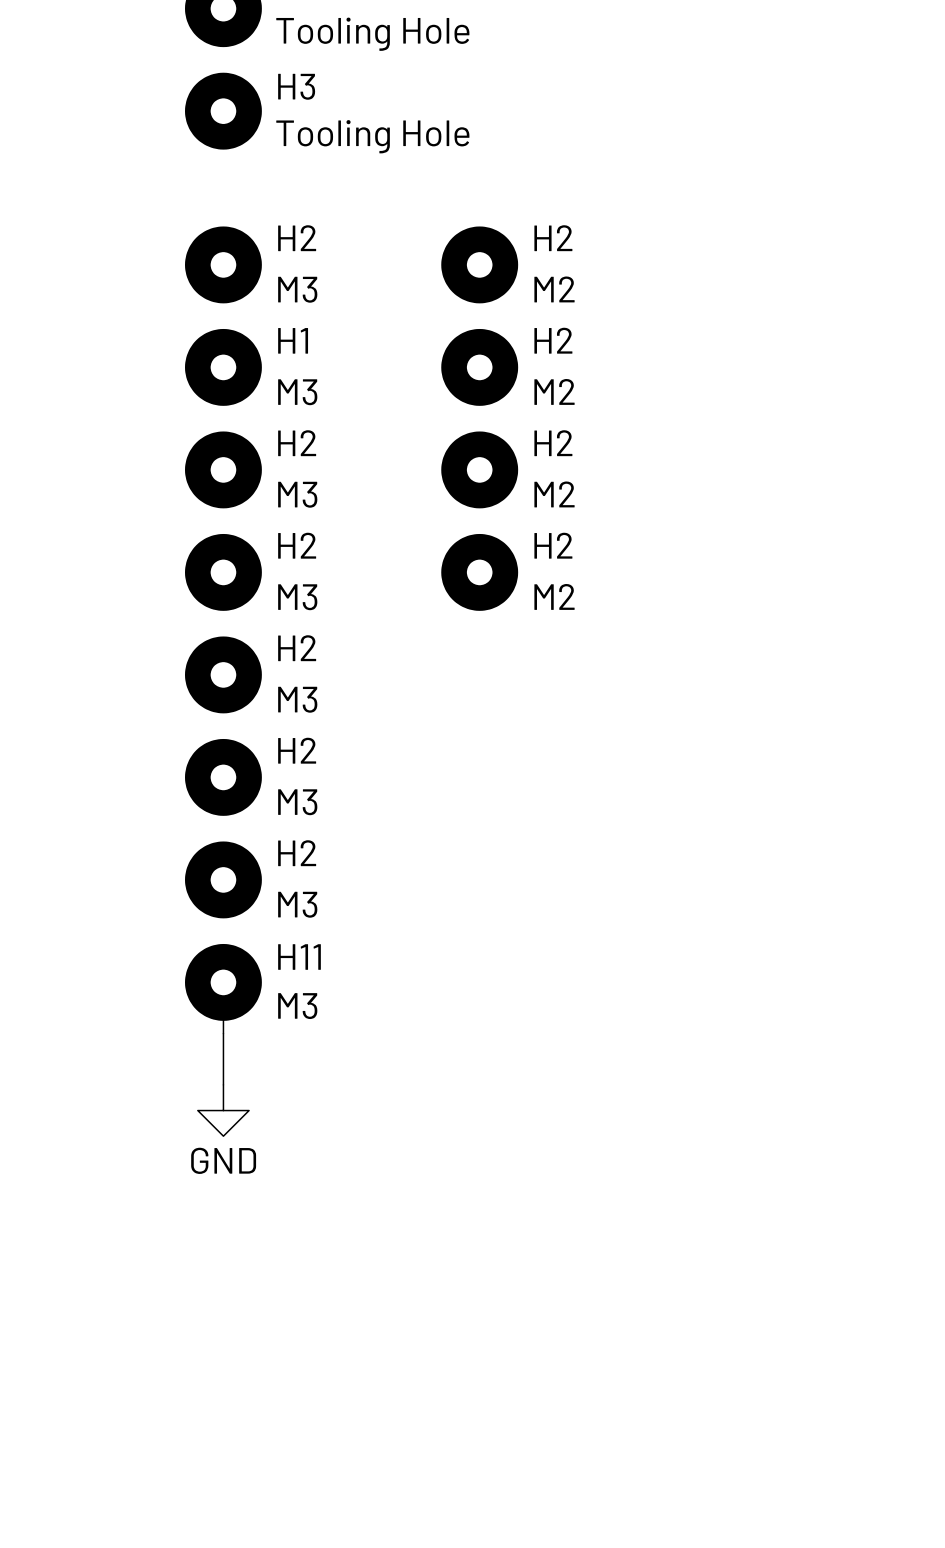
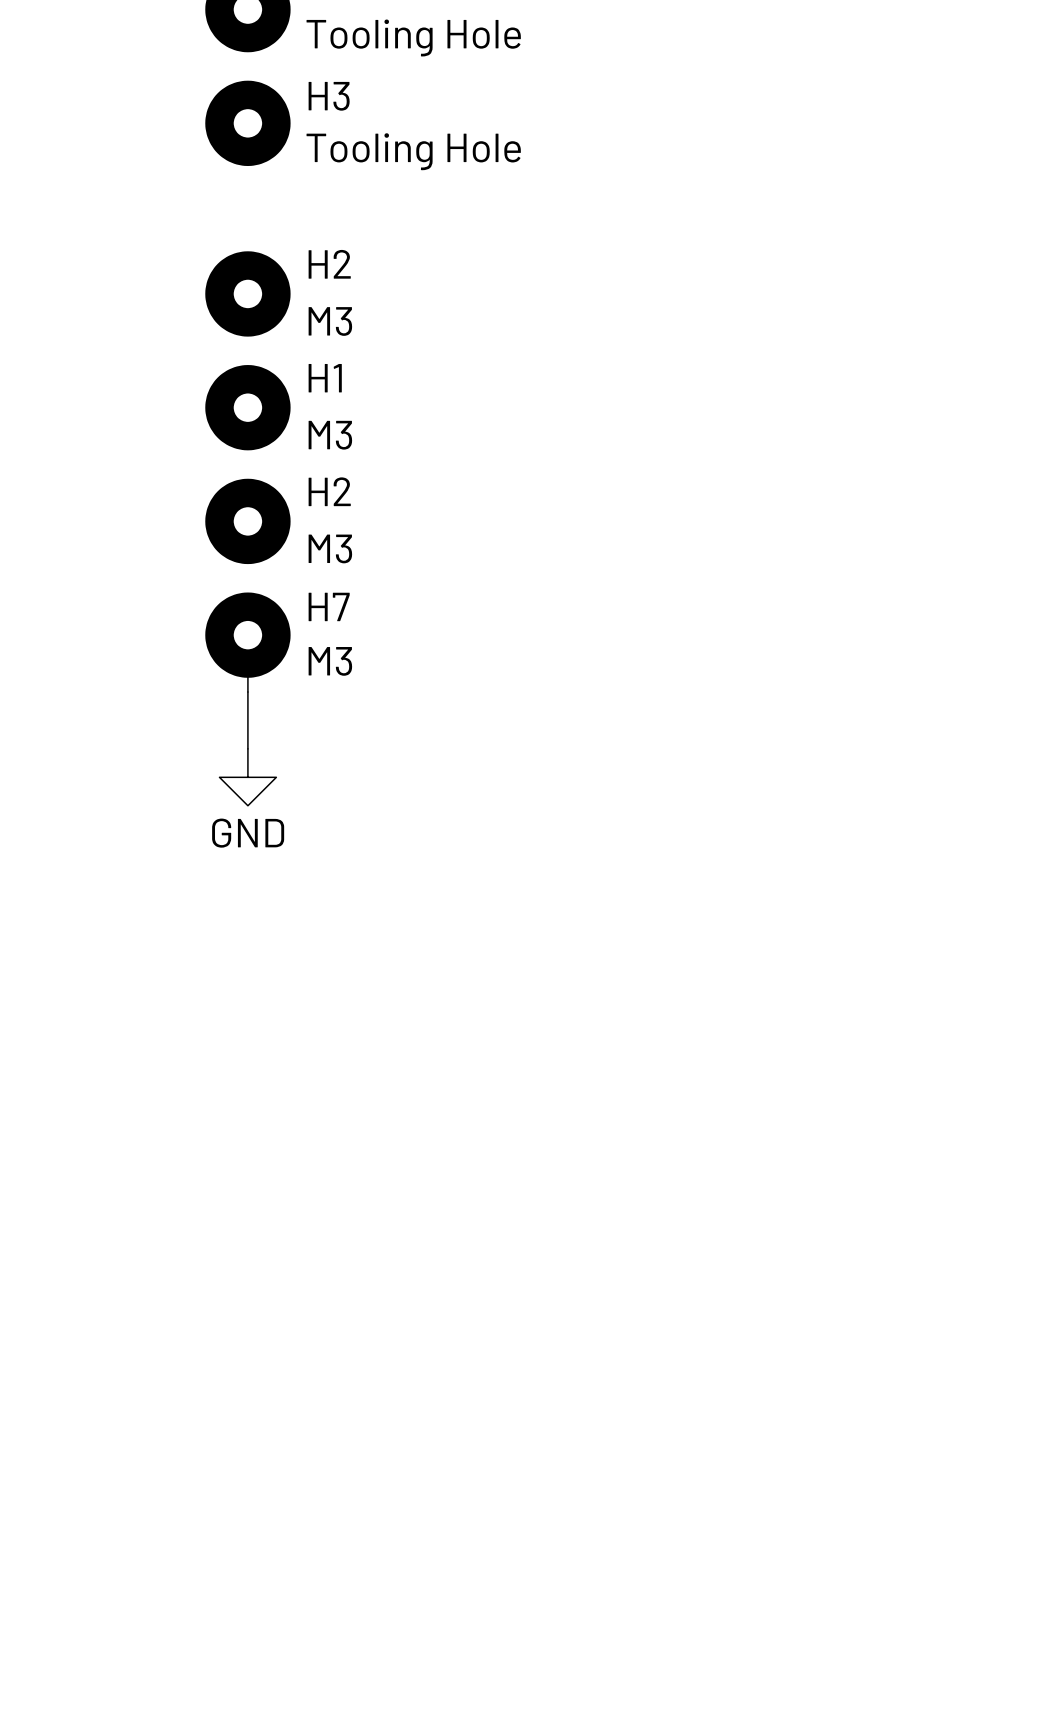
H2: M2 (479, 264) -> none
H2: M2 (479, 367) -> none
H2: M2 (479, 469) -> none
H2: M3 (223, 572) -> none
H2: M2 (479, 572) -> none
H7: none -> M3 (247, 642)
H2: M3 (223, 674) -> none
H2: M3 (223, 777) -> none
H2: M3 (223, 879) -> none
H11: M3 (223, 988) -> none
wire: (223, 1033) (223, 1084) -> (247, 692) (247, 748)
power symbol position: GND (223, 1110) -> GND (247, 777)

